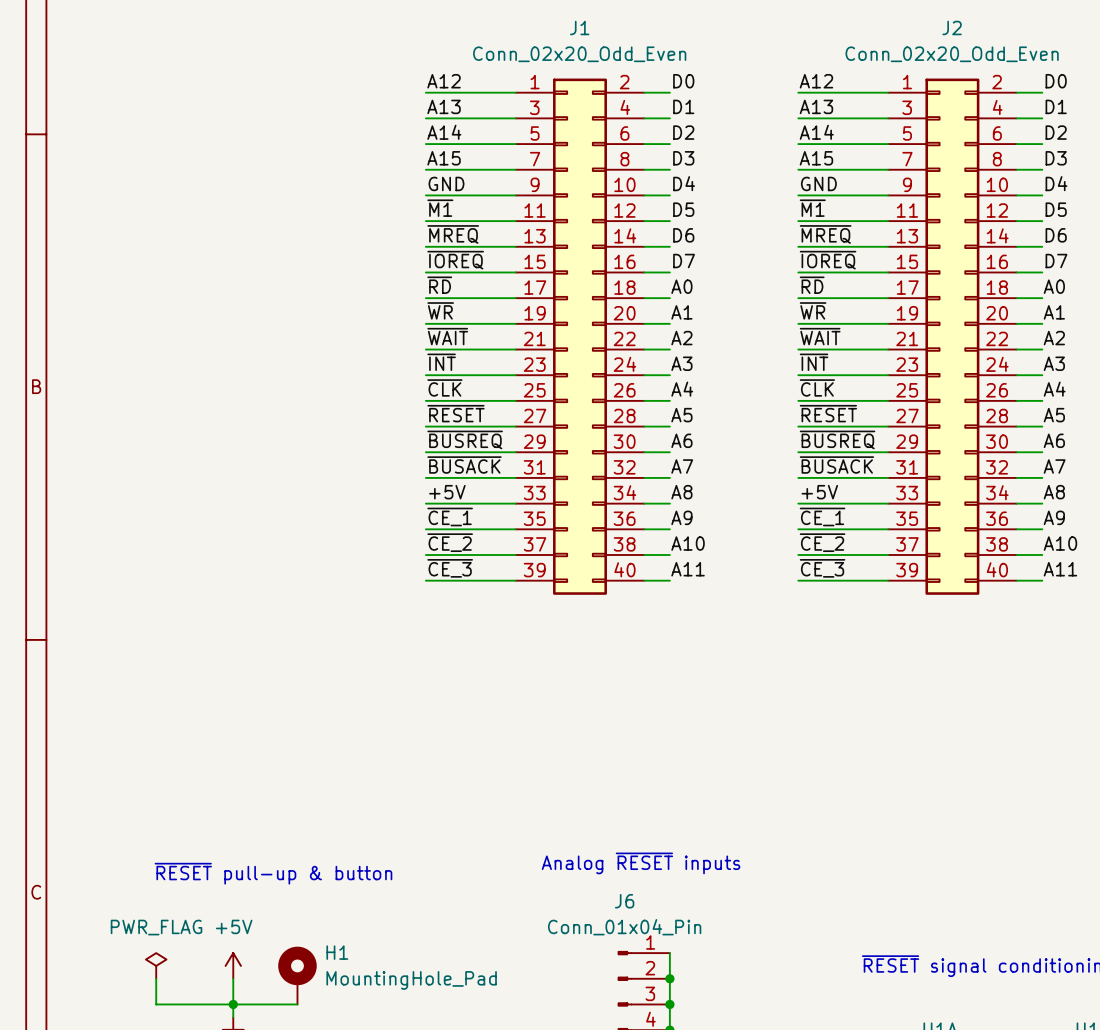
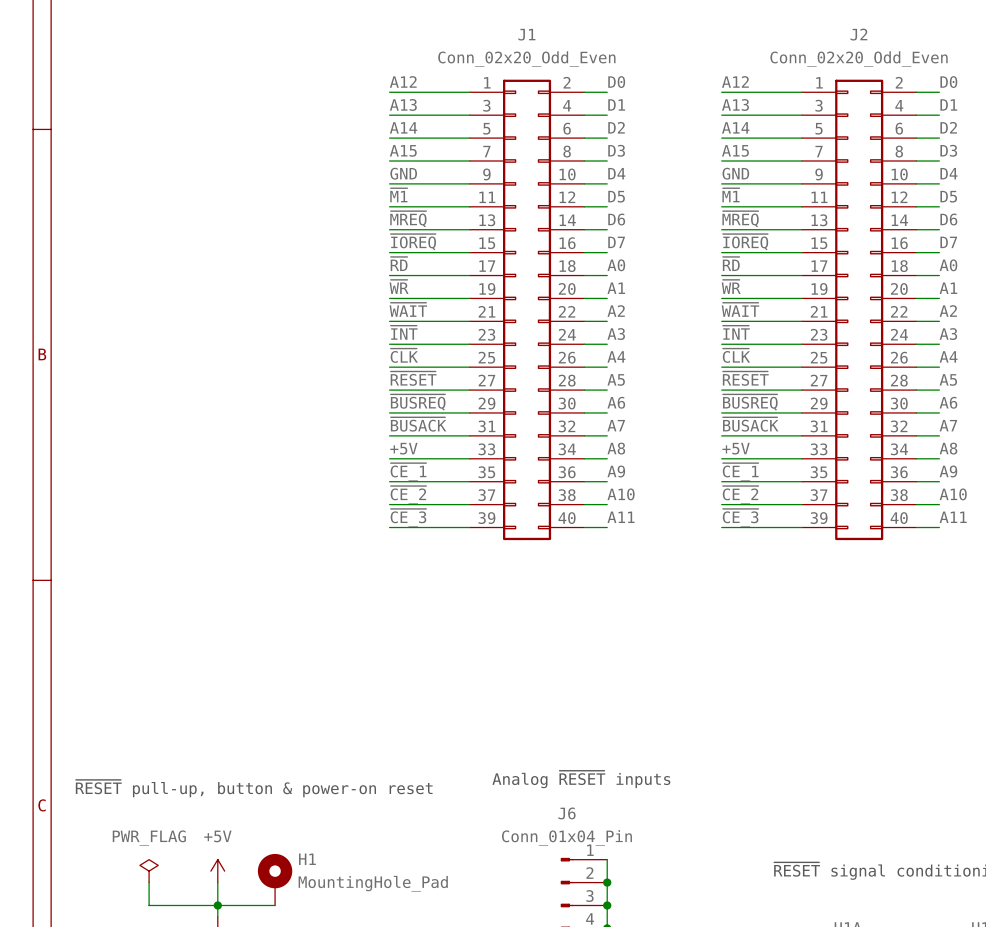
text: ~{RESET} pull-up & button (273, 873) -> ~{RESET} pull-up, button & power-on reset (254, 788)

